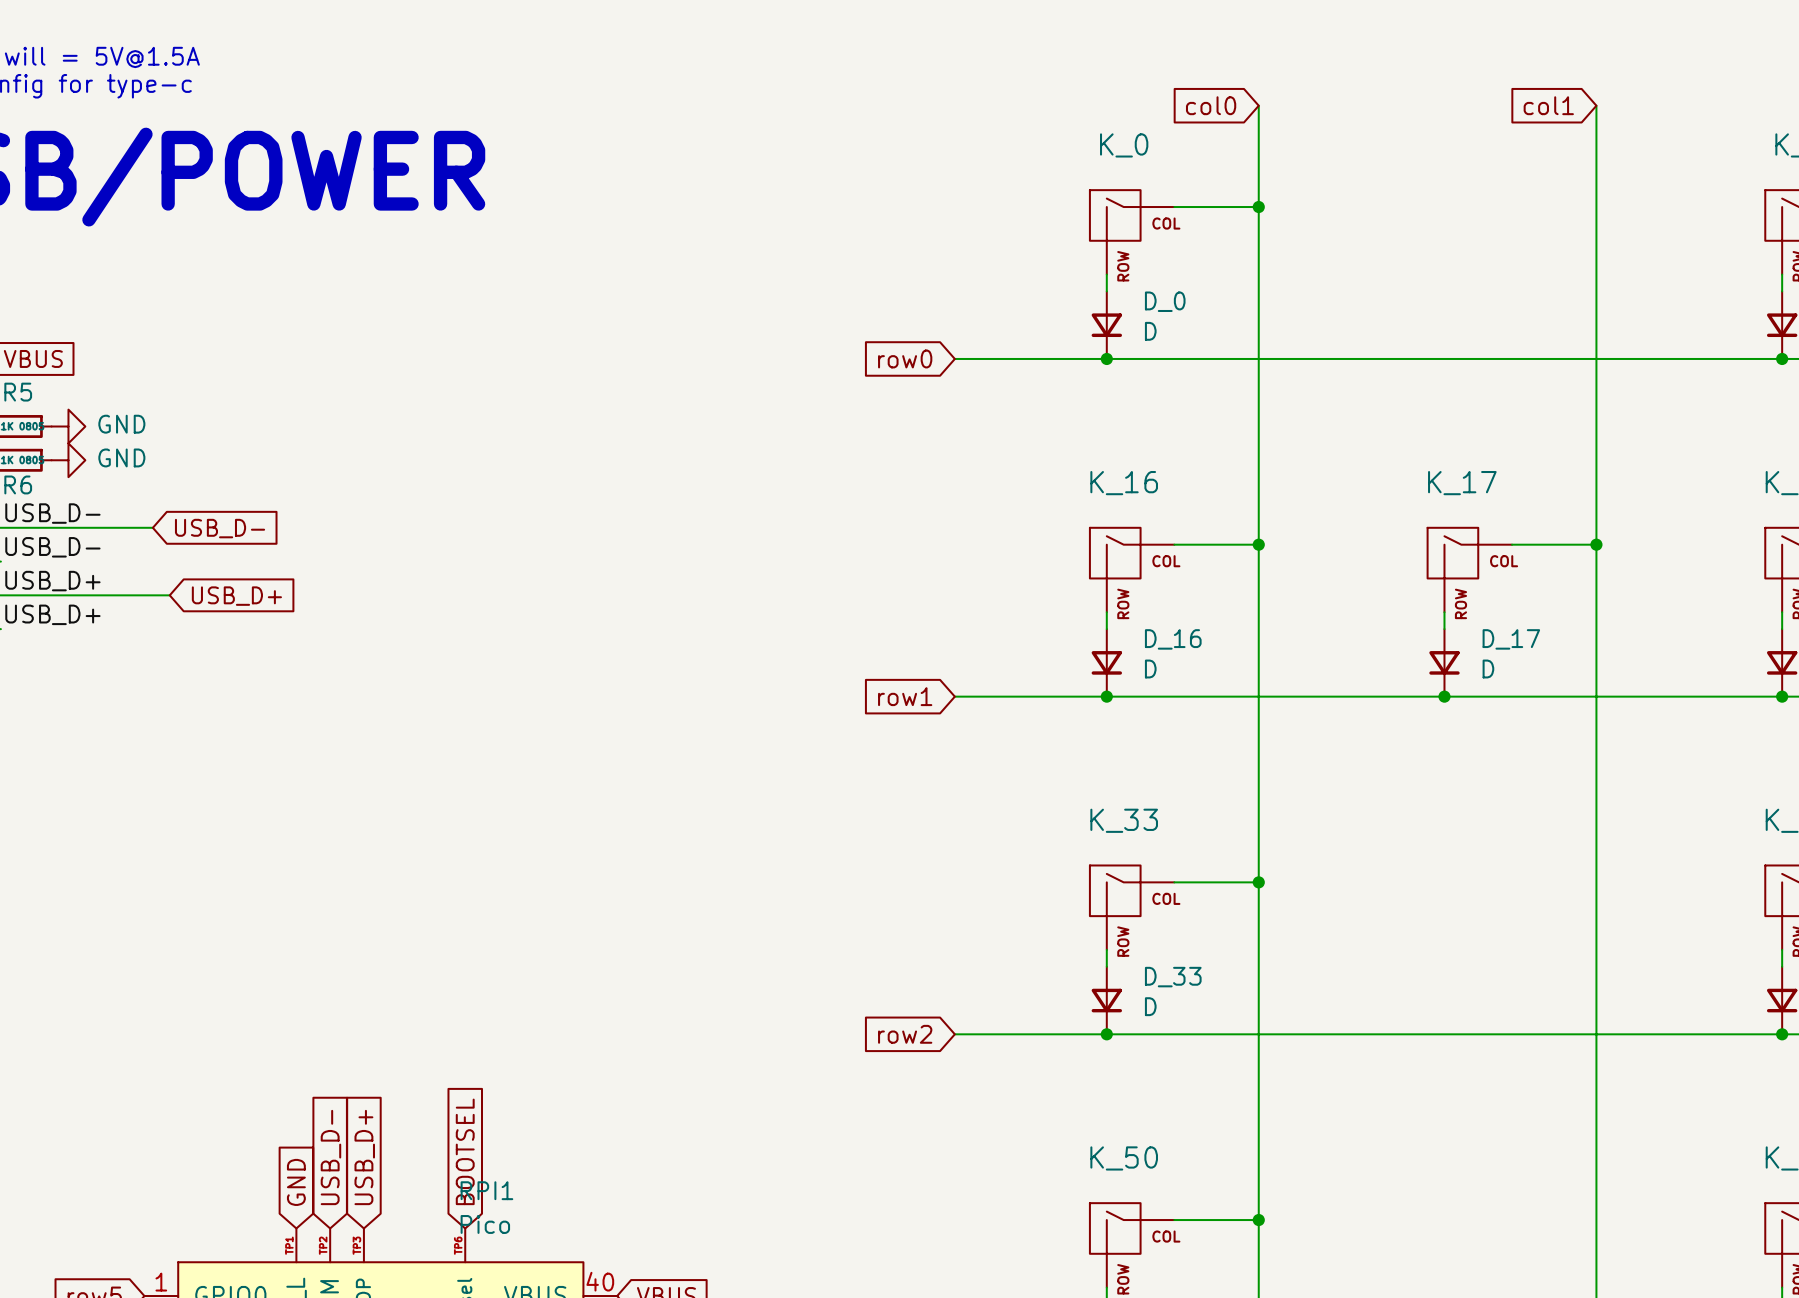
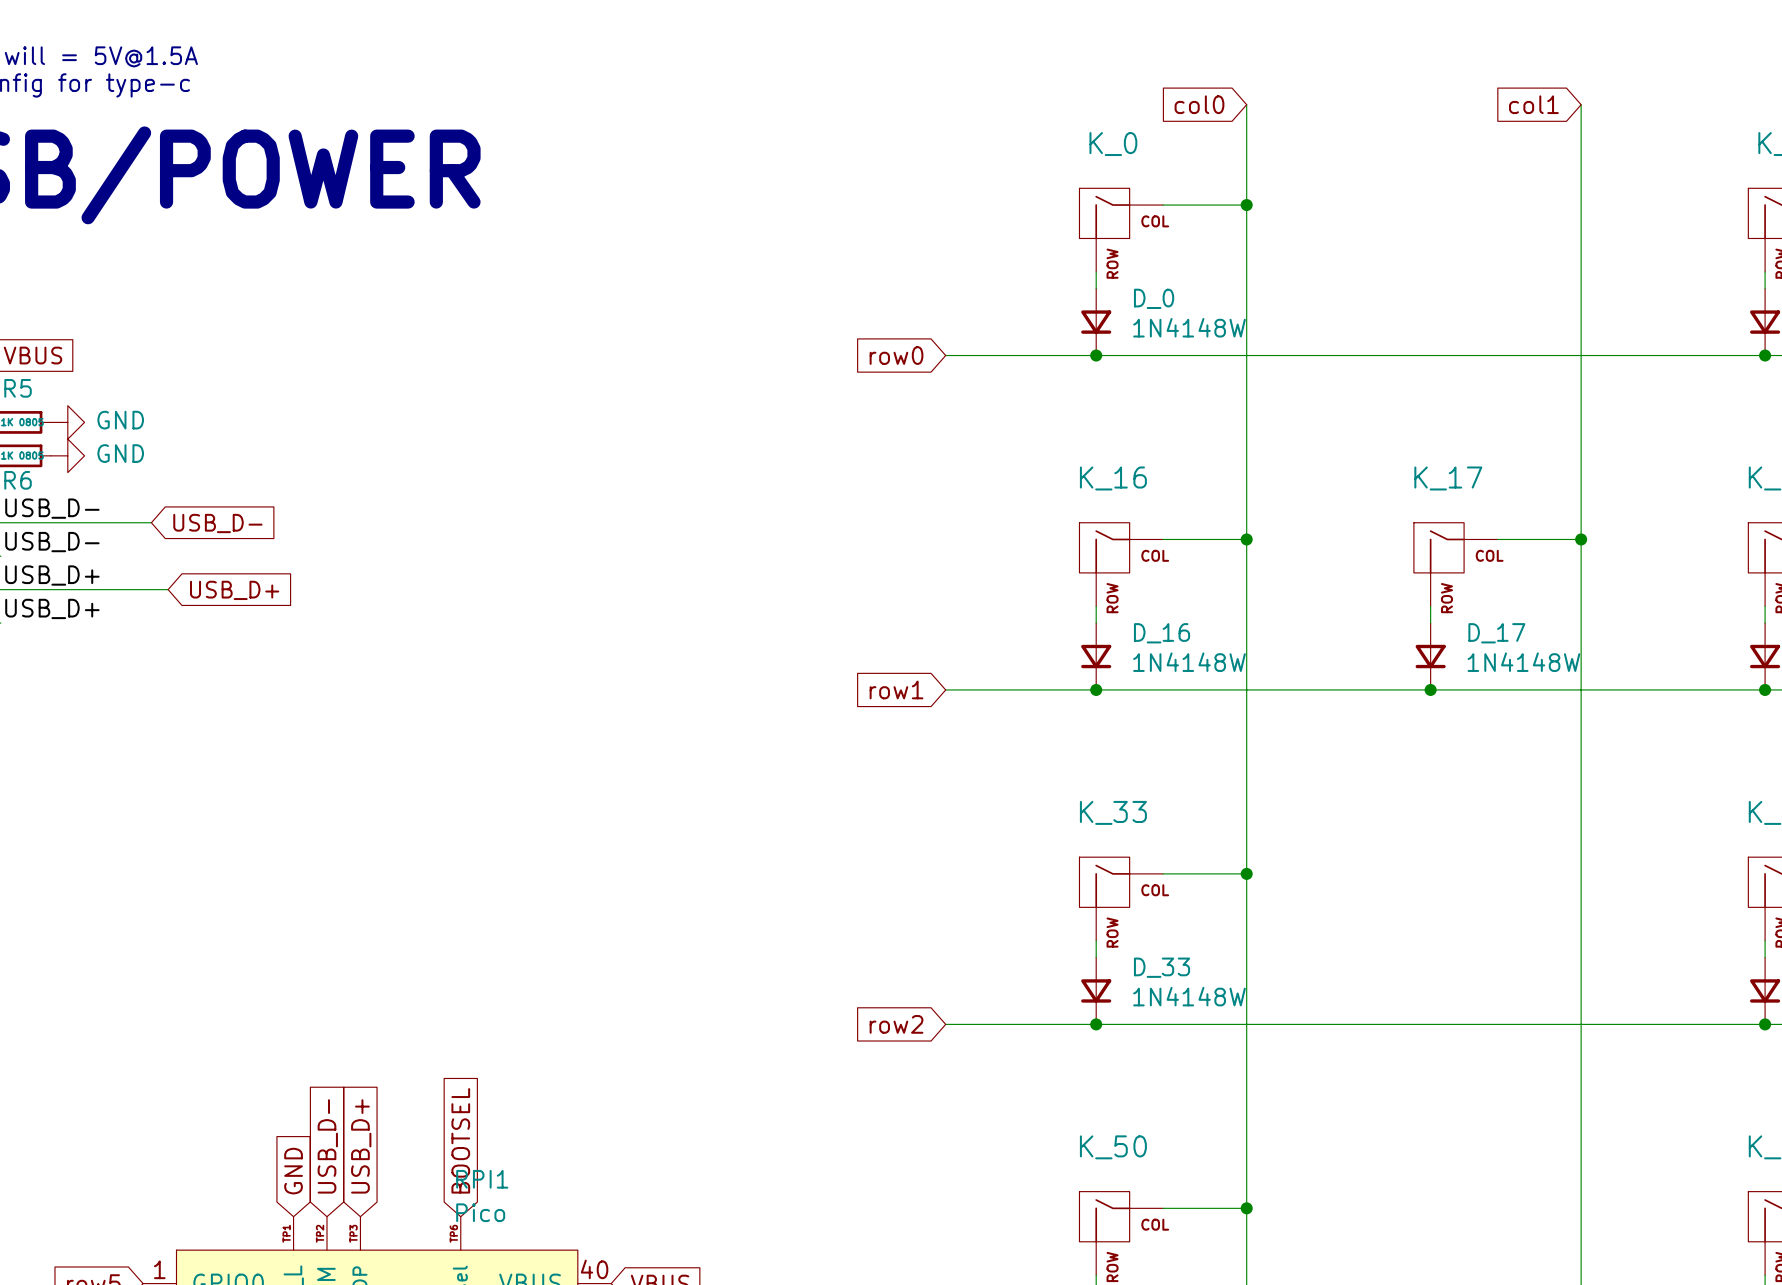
D_0 value: D (1150, 331) -> 1N4148W (1189, 327)
D_16 value: D (1150, 669) -> 1N4148W (1189, 662)
D_17 value: D (1488, 669) -> 1N4148W (1523, 662)
D_33 value: D (1150, 1006) -> 1N4148W (1189, 996)

